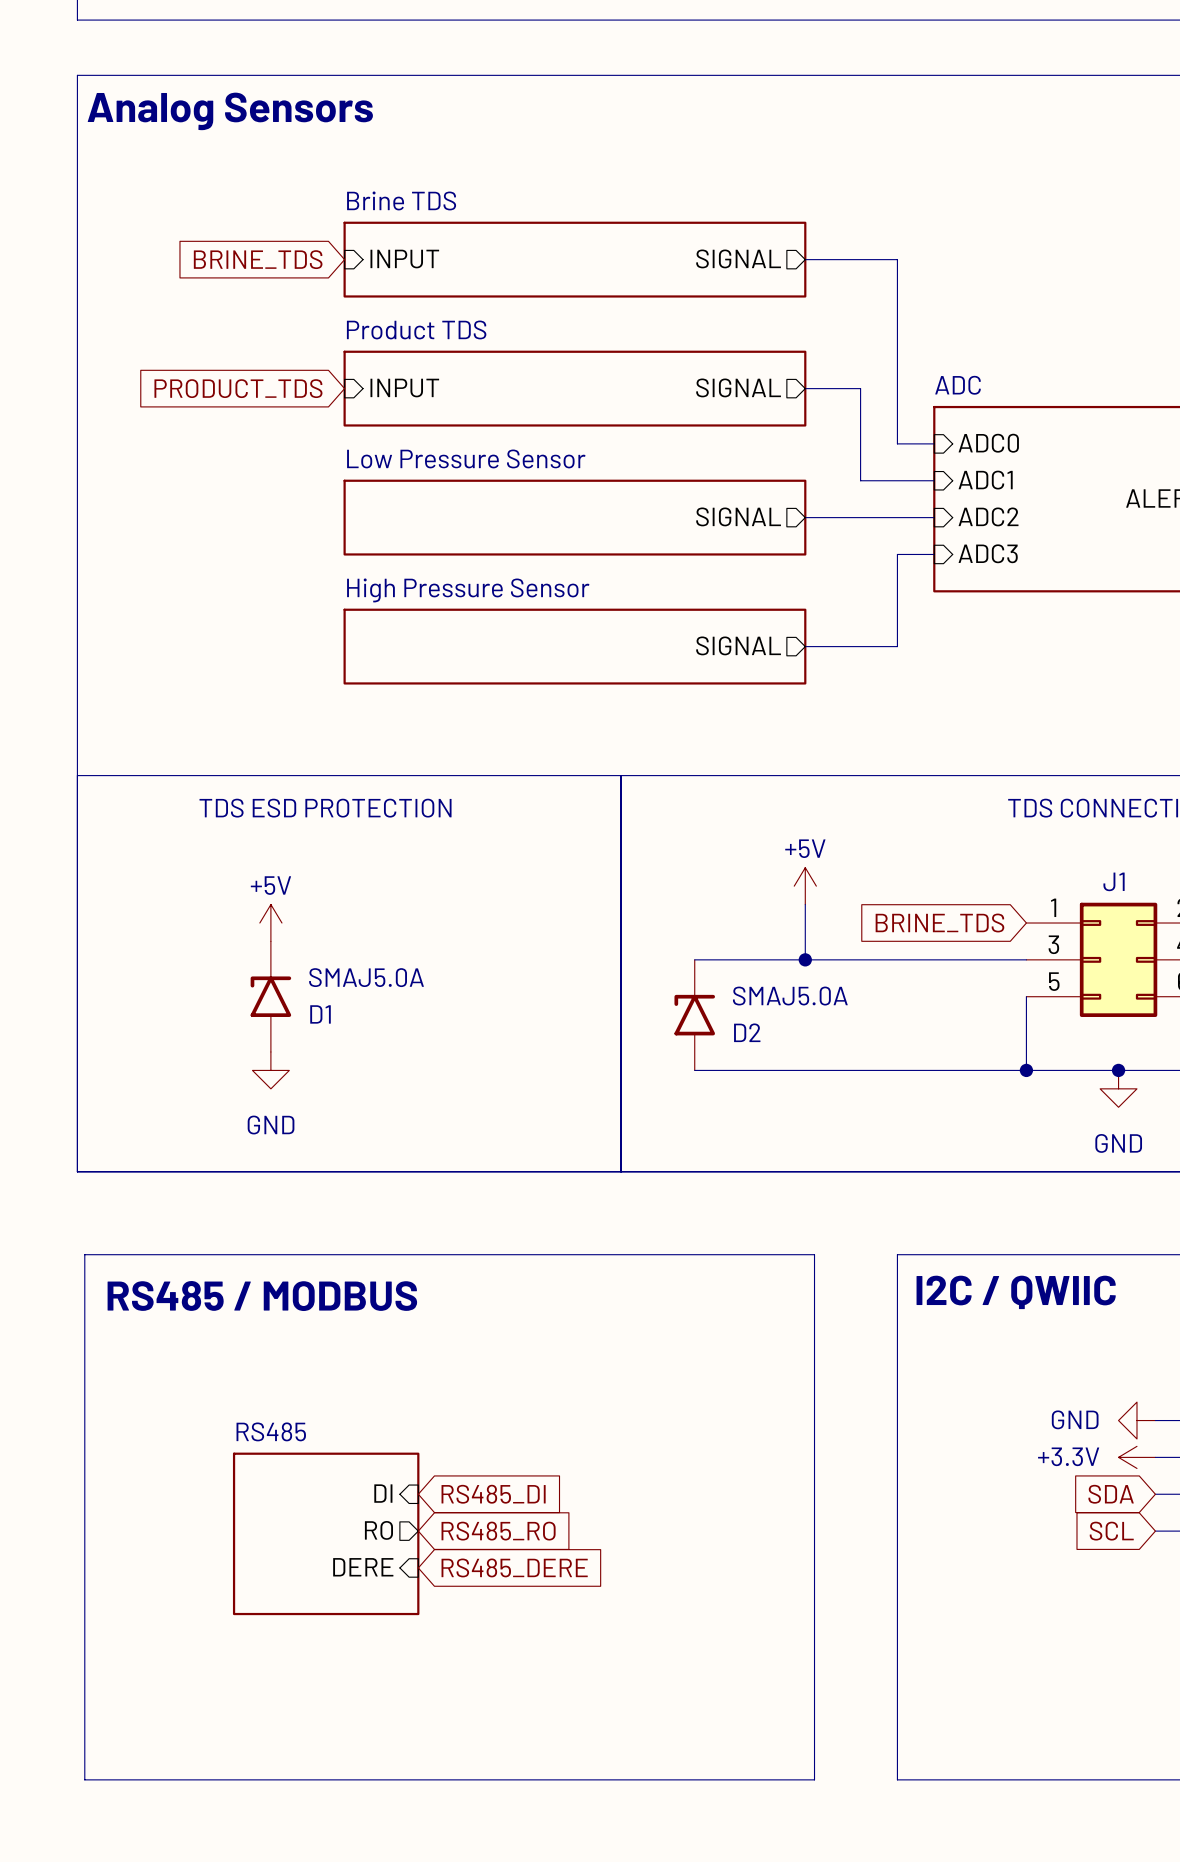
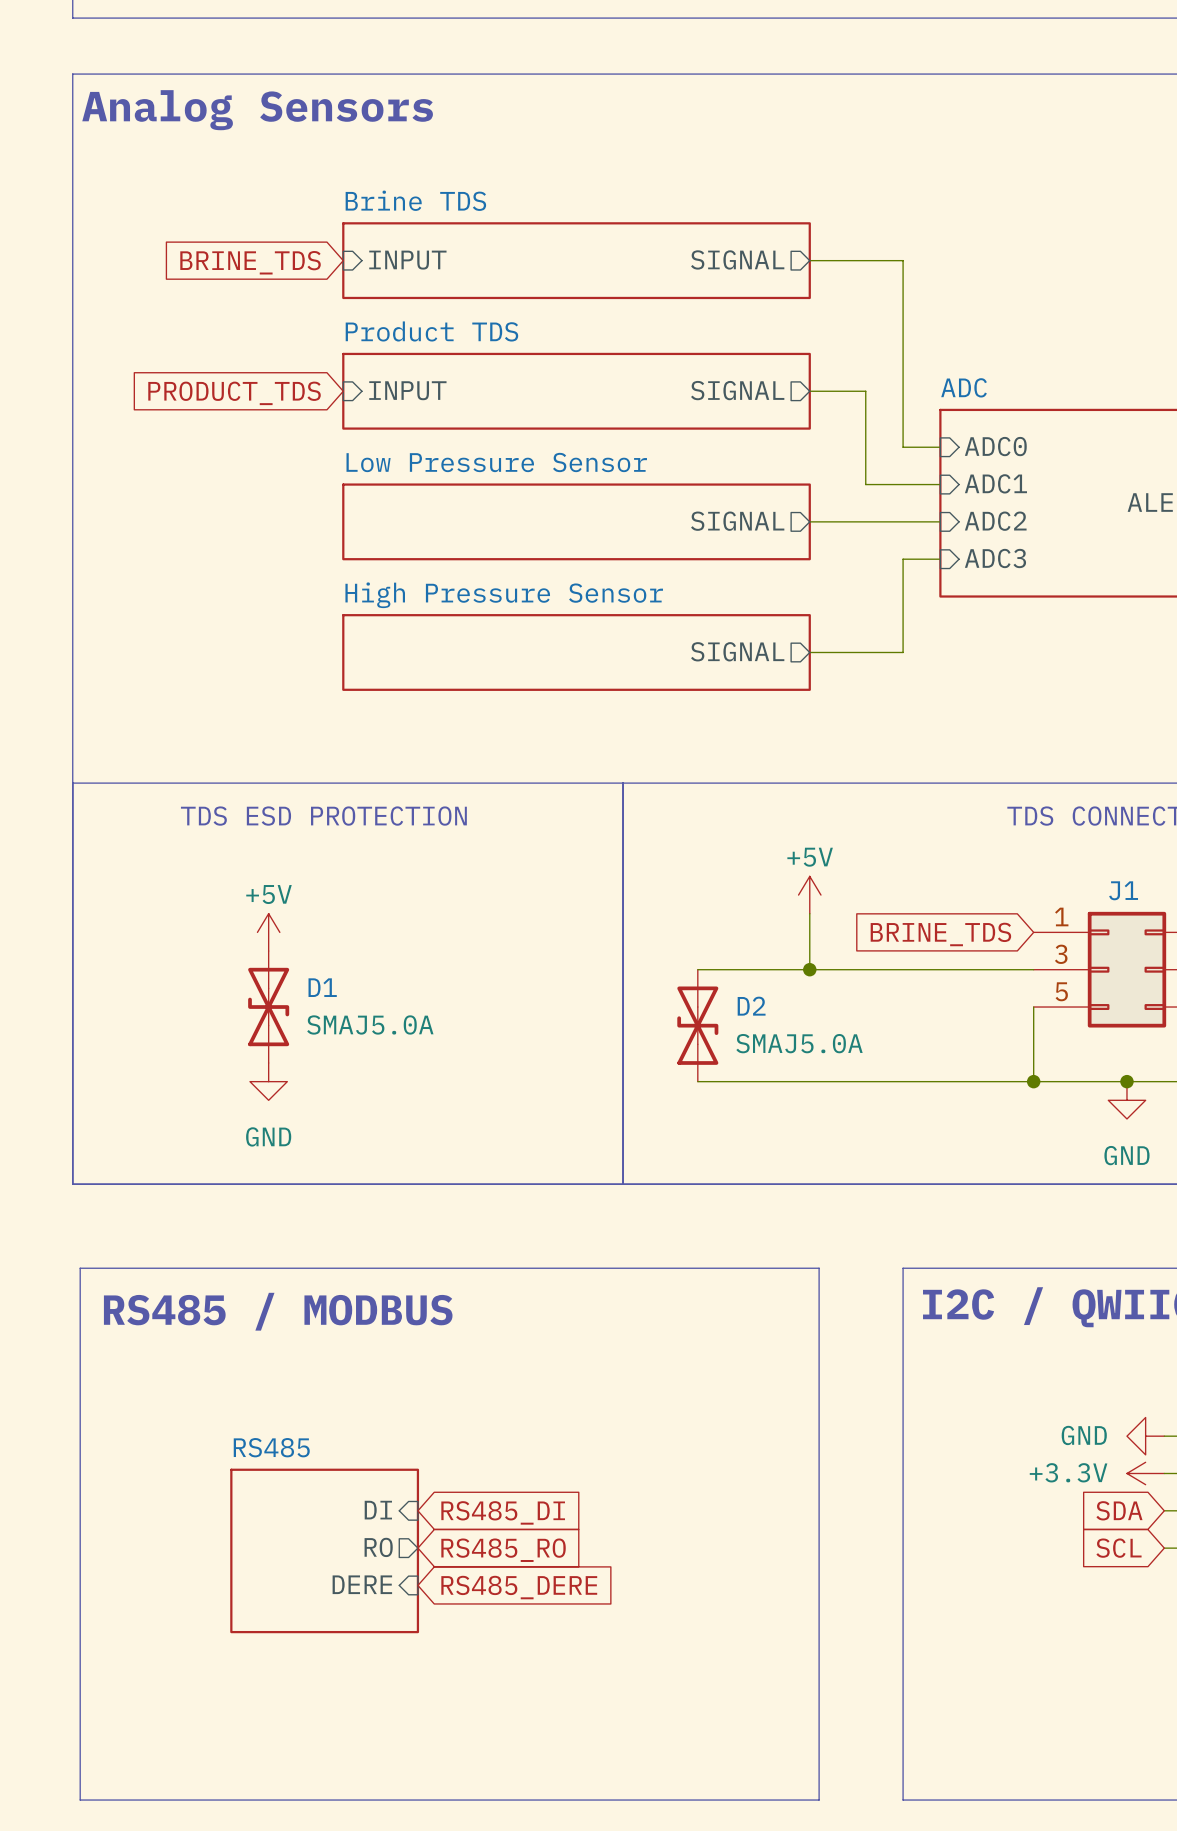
D1 symbol: [250, 941, 292, 1053] -> [248, 951, 290, 1063]
D2 symbol: [674, 959, 716, 1071] -> [677, 969, 719, 1082]
D1 value position: SMAJ5.0A (366, 977) -> SMAJ5.0A (370, 1024)
D2 value position: SMAJ5.0A (790, 996) -> SMAJ5.0A (799, 1043)
D1 name position: D1 (320, 1014) -> D1 (322, 987)
D2 name position: D2 (747, 1032) -> D2 (751, 1006)

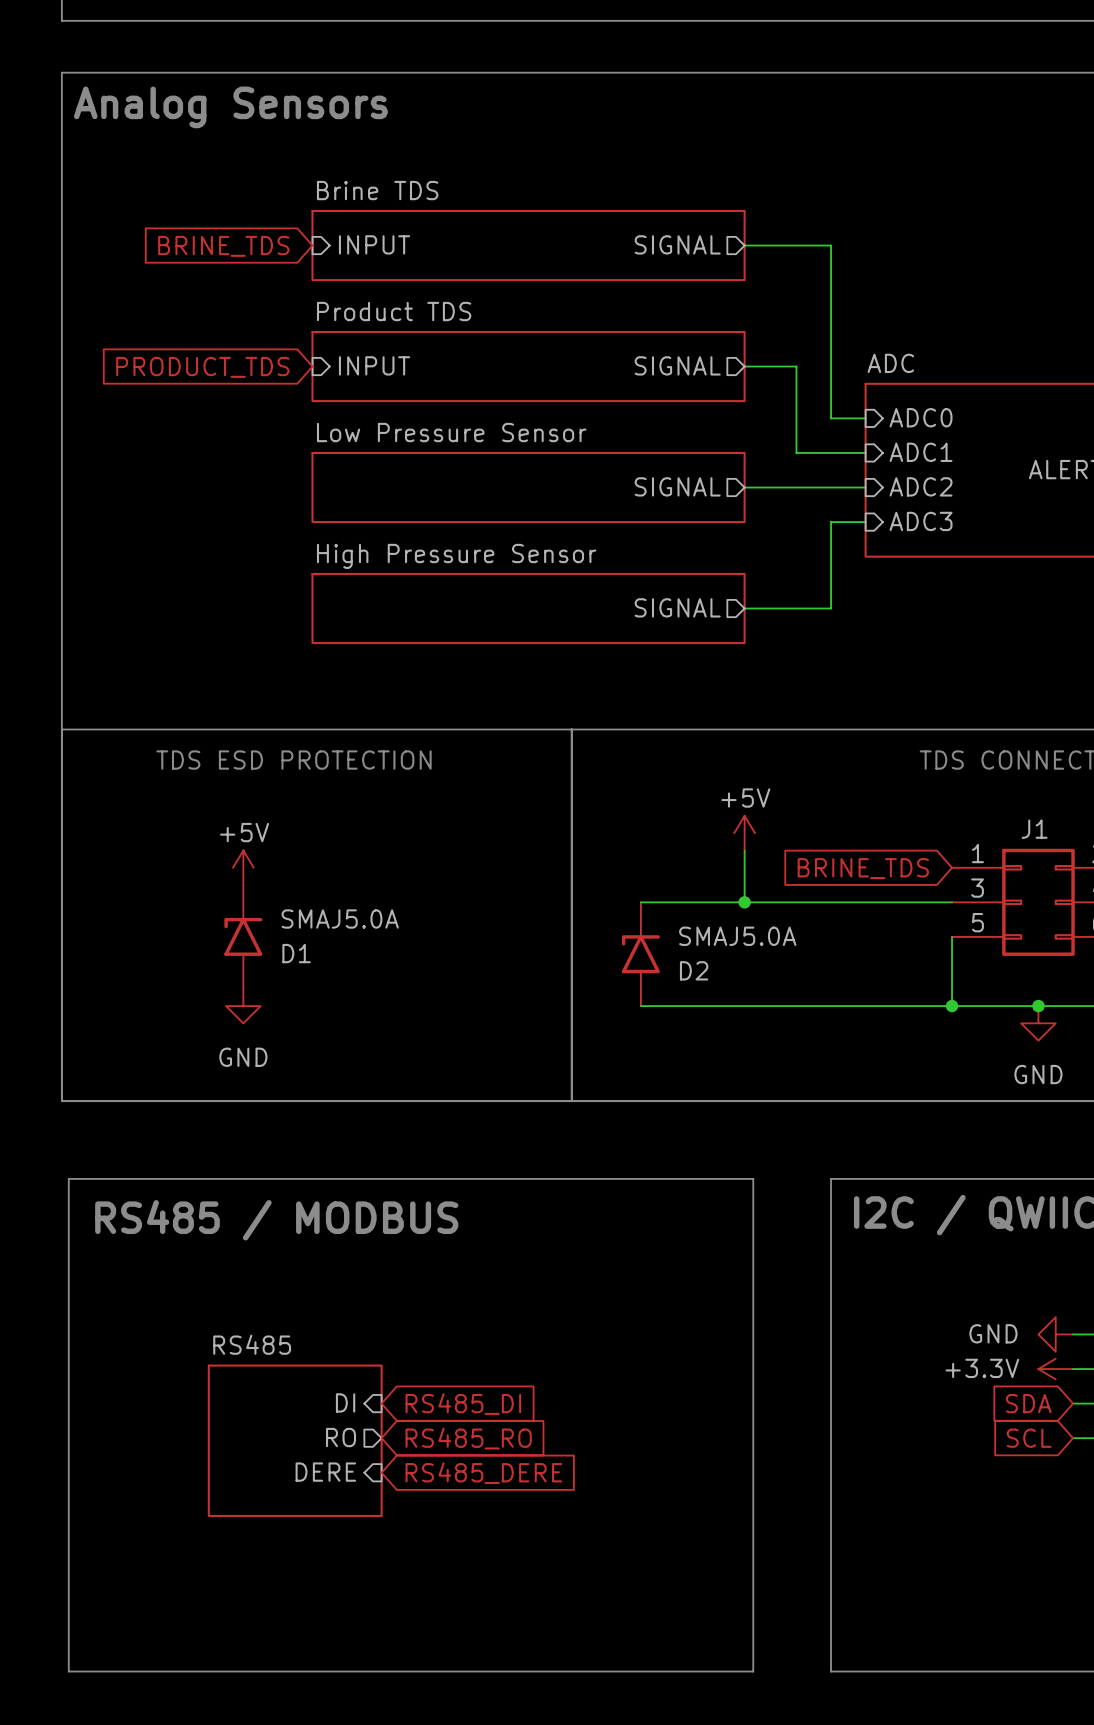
D1 symbol: [248, 951, 290, 1063] -> [224, 885, 263, 989]
D2 symbol: [677, 969, 719, 1082] -> [621, 902, 660, 1007]
D1 name position: D1 (322, 987) -> D1 (296, 953)
D2 name position: D2 (751, 1006) -> D2 (694, 970)
D1 value position: SMAJ5.0A (370, 1024) -> SMAJ5.0A (340, 918)
D2 value position: SMAJ5.0A (799, 1043) -> SMAJ5.0A (737, 936)

